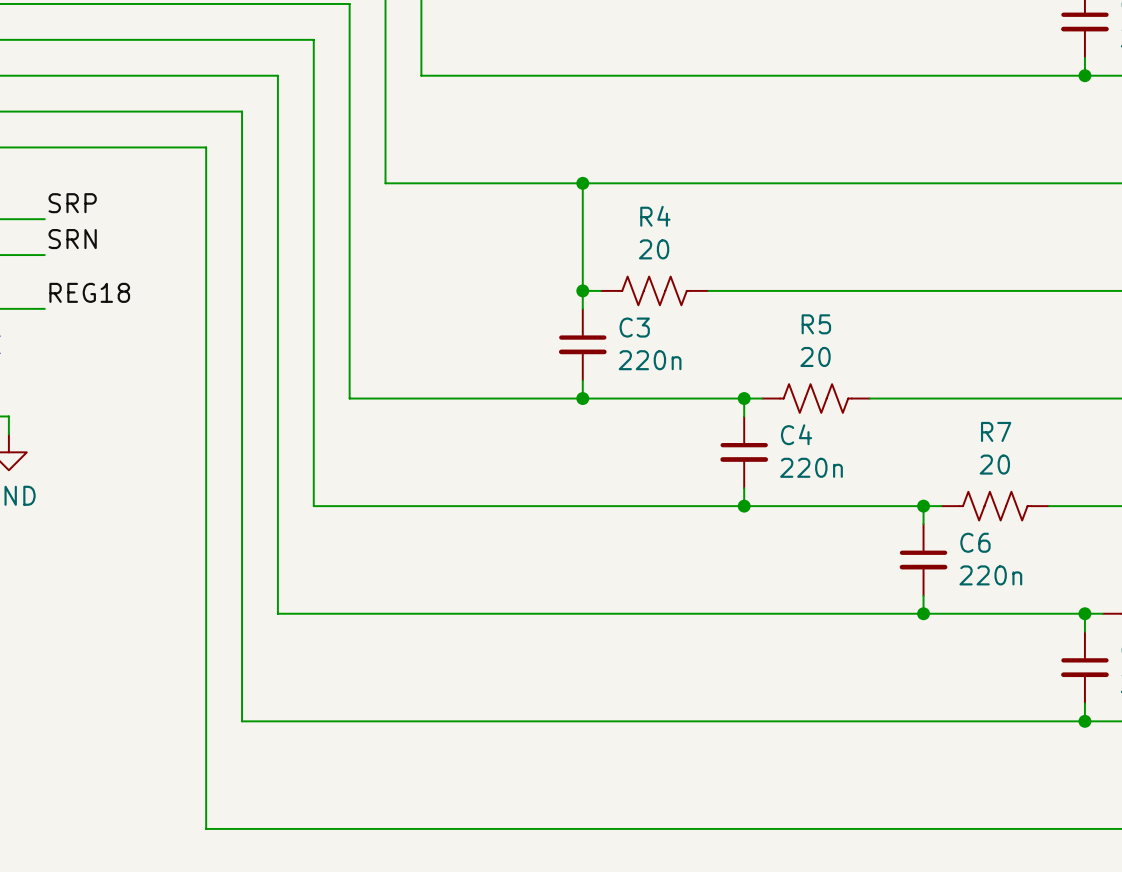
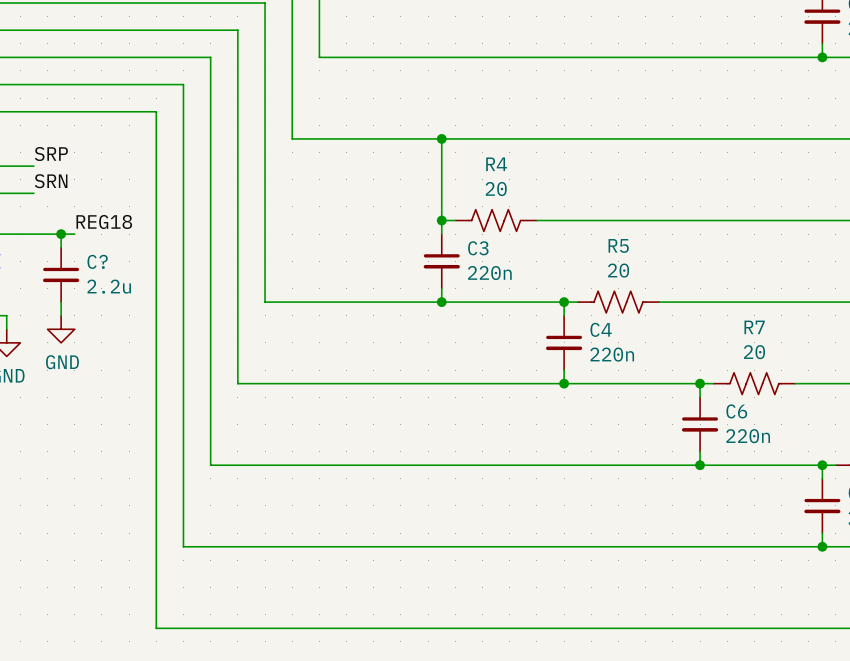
label position: REG18 (89, 292) -> REG18 (104, 221)
wire: none -> (33, 234) (74, 234)
wire: none -> (61, 234) (61, 247)
junction: none -> (61, 234)
C?: none -> 2.2u (61, 274)
wire: none -> (61, 302) (61, 315)
power symbol: none -> GND (61, 329)

